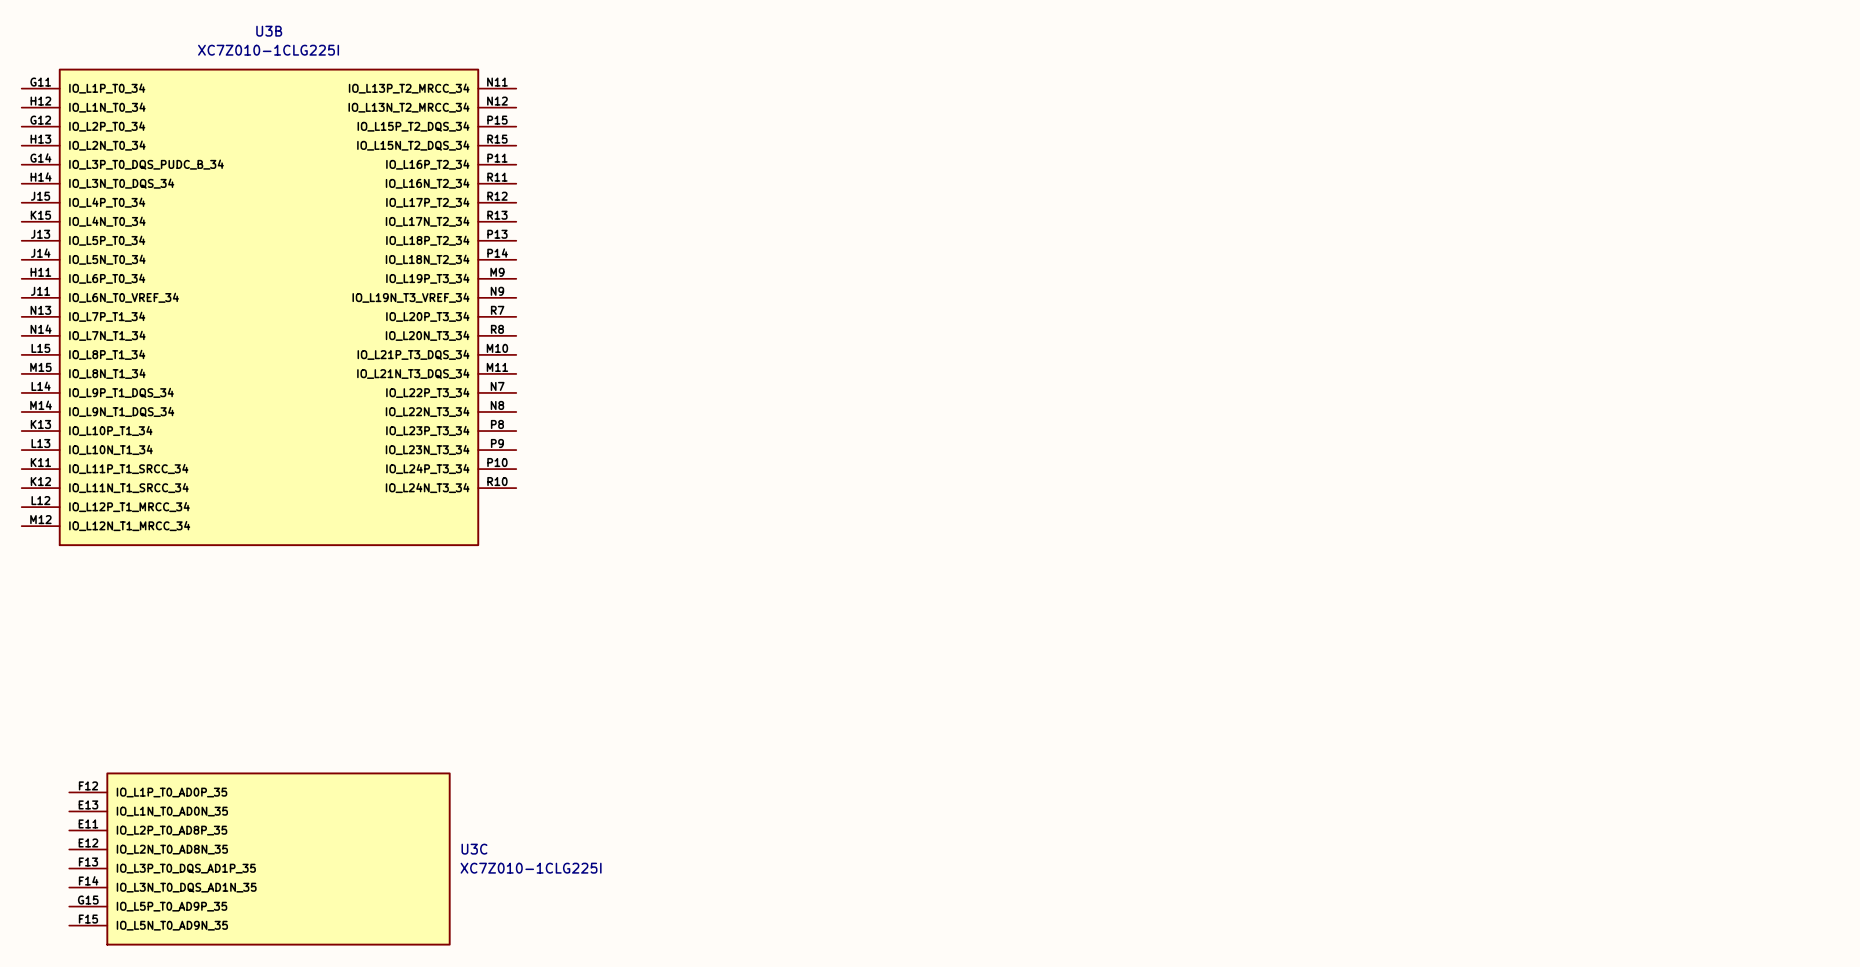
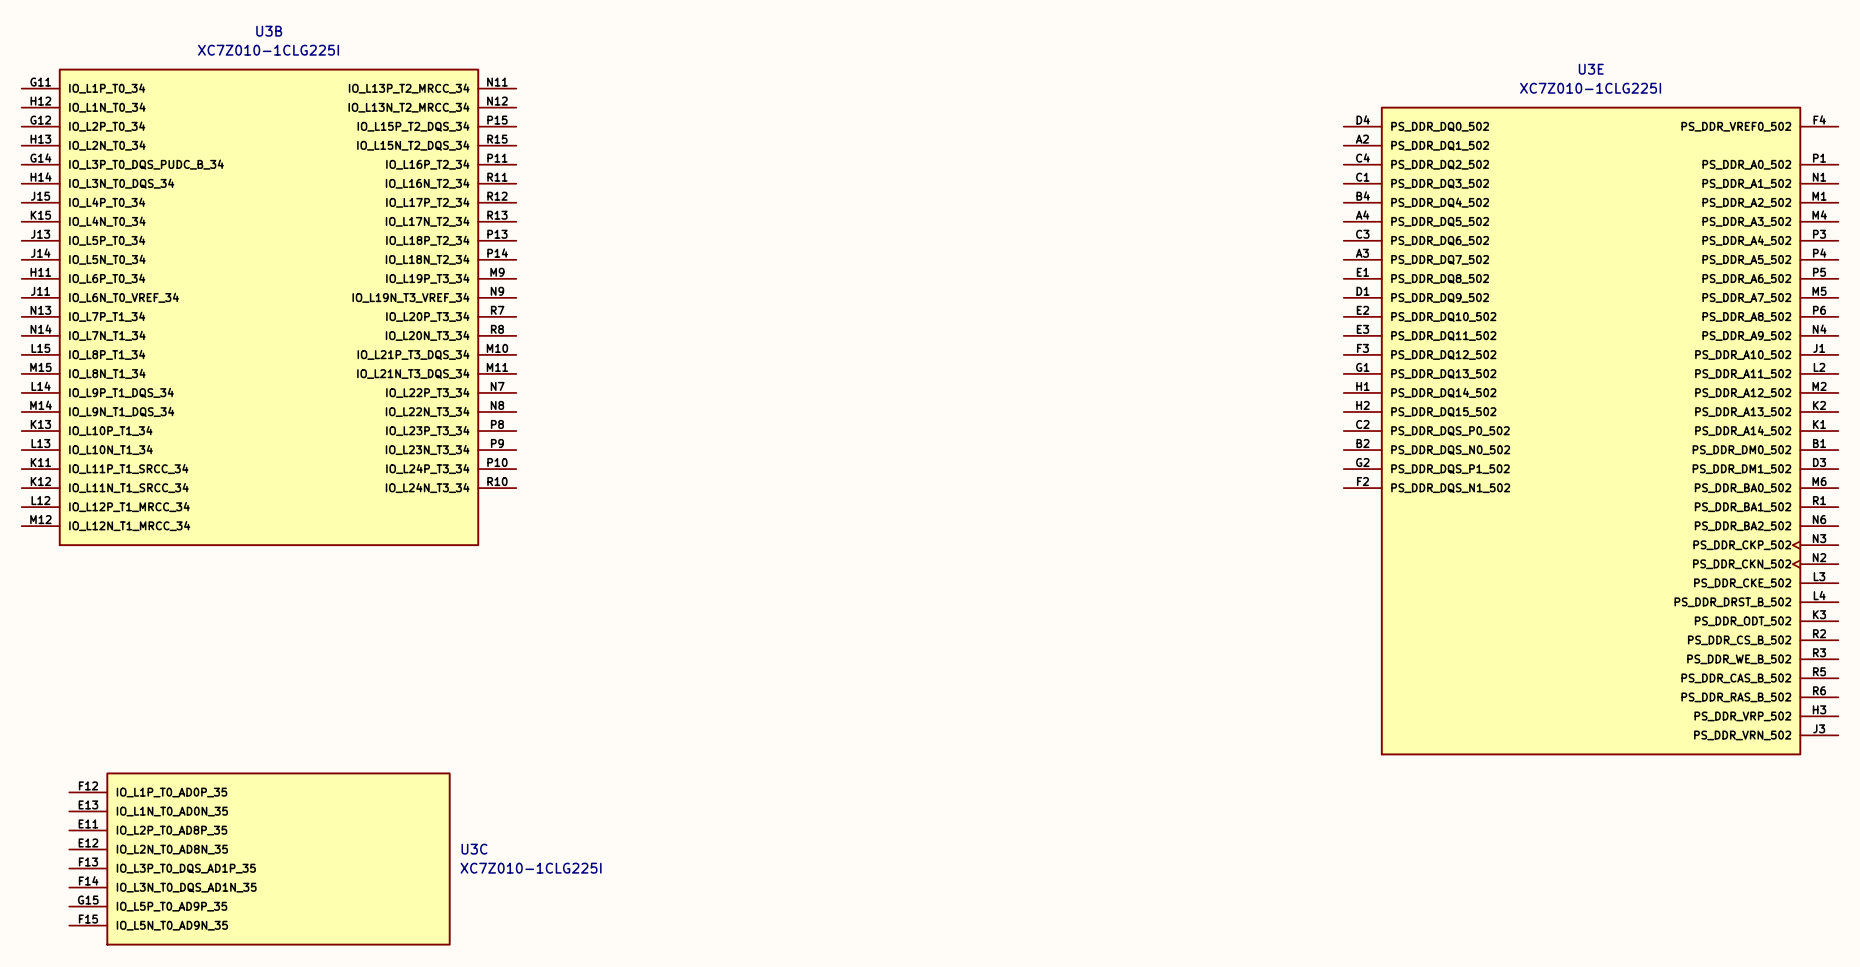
U3E: none -> XC7Z010-1CLG225I (1591, 431)

